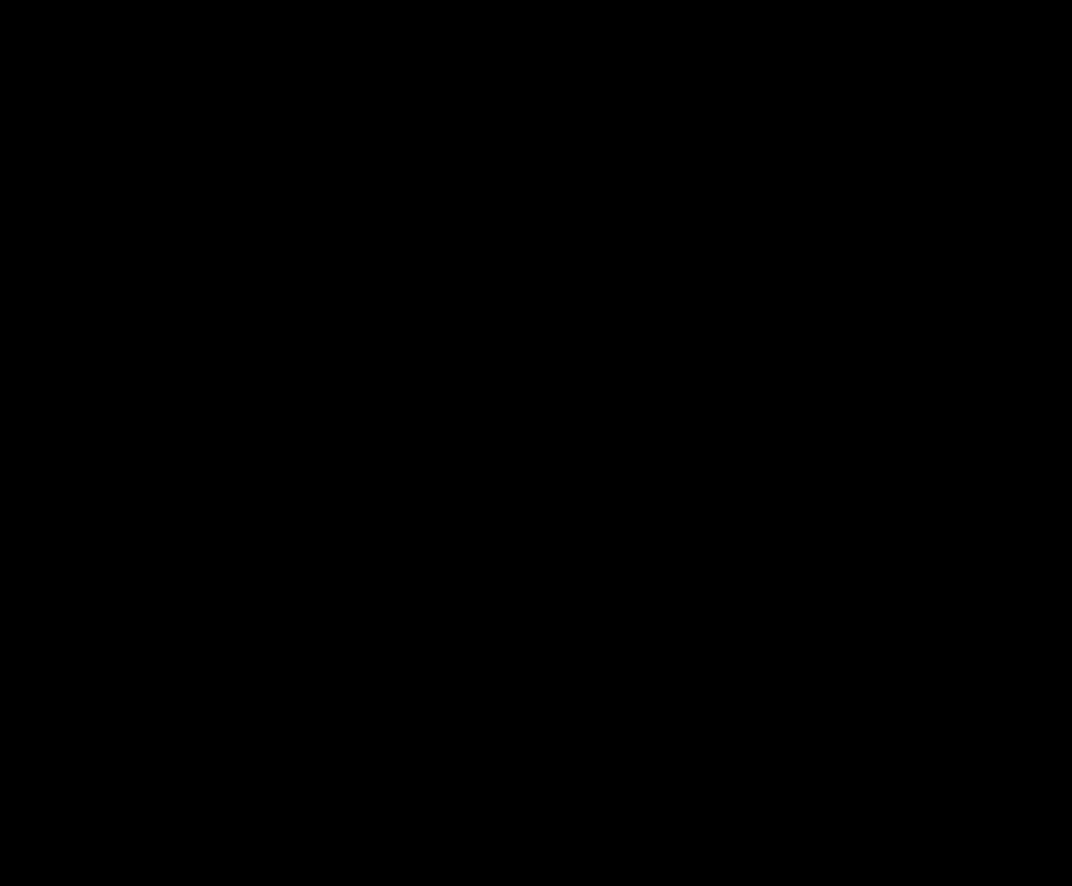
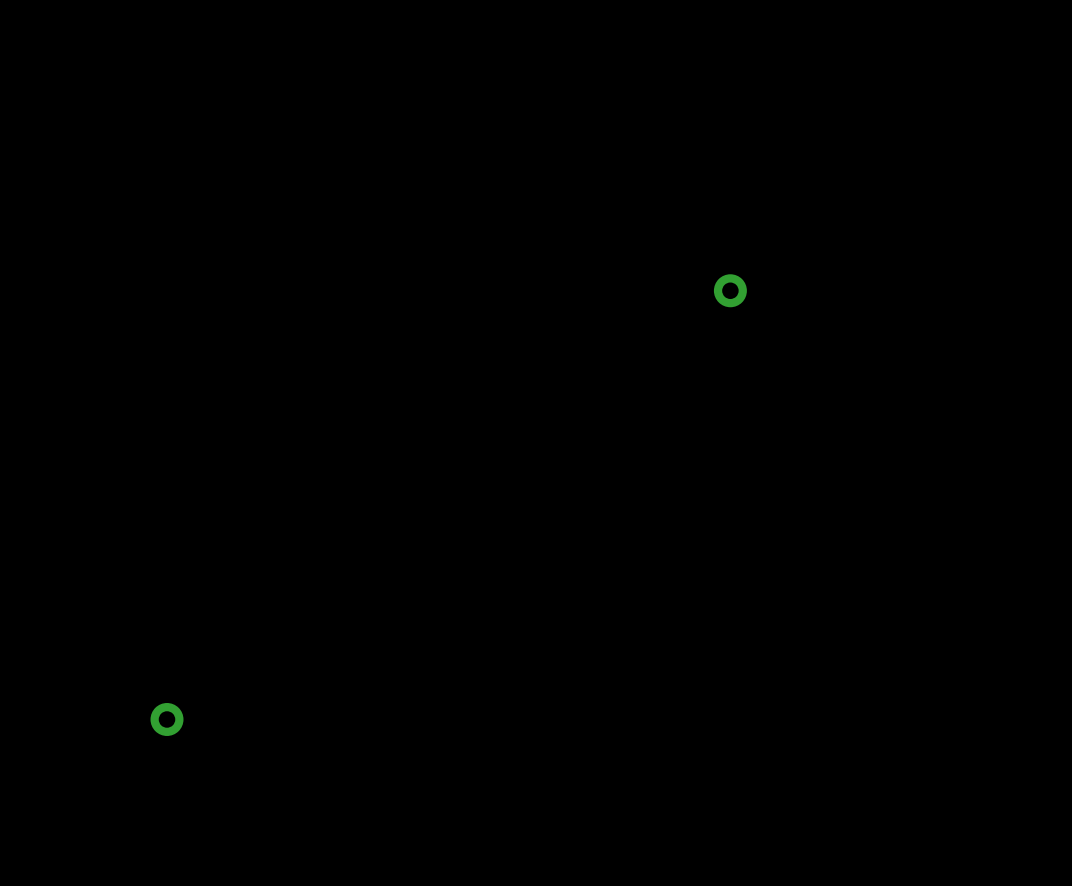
via: none -> (730, 290)
via: none -> (167, 719)

